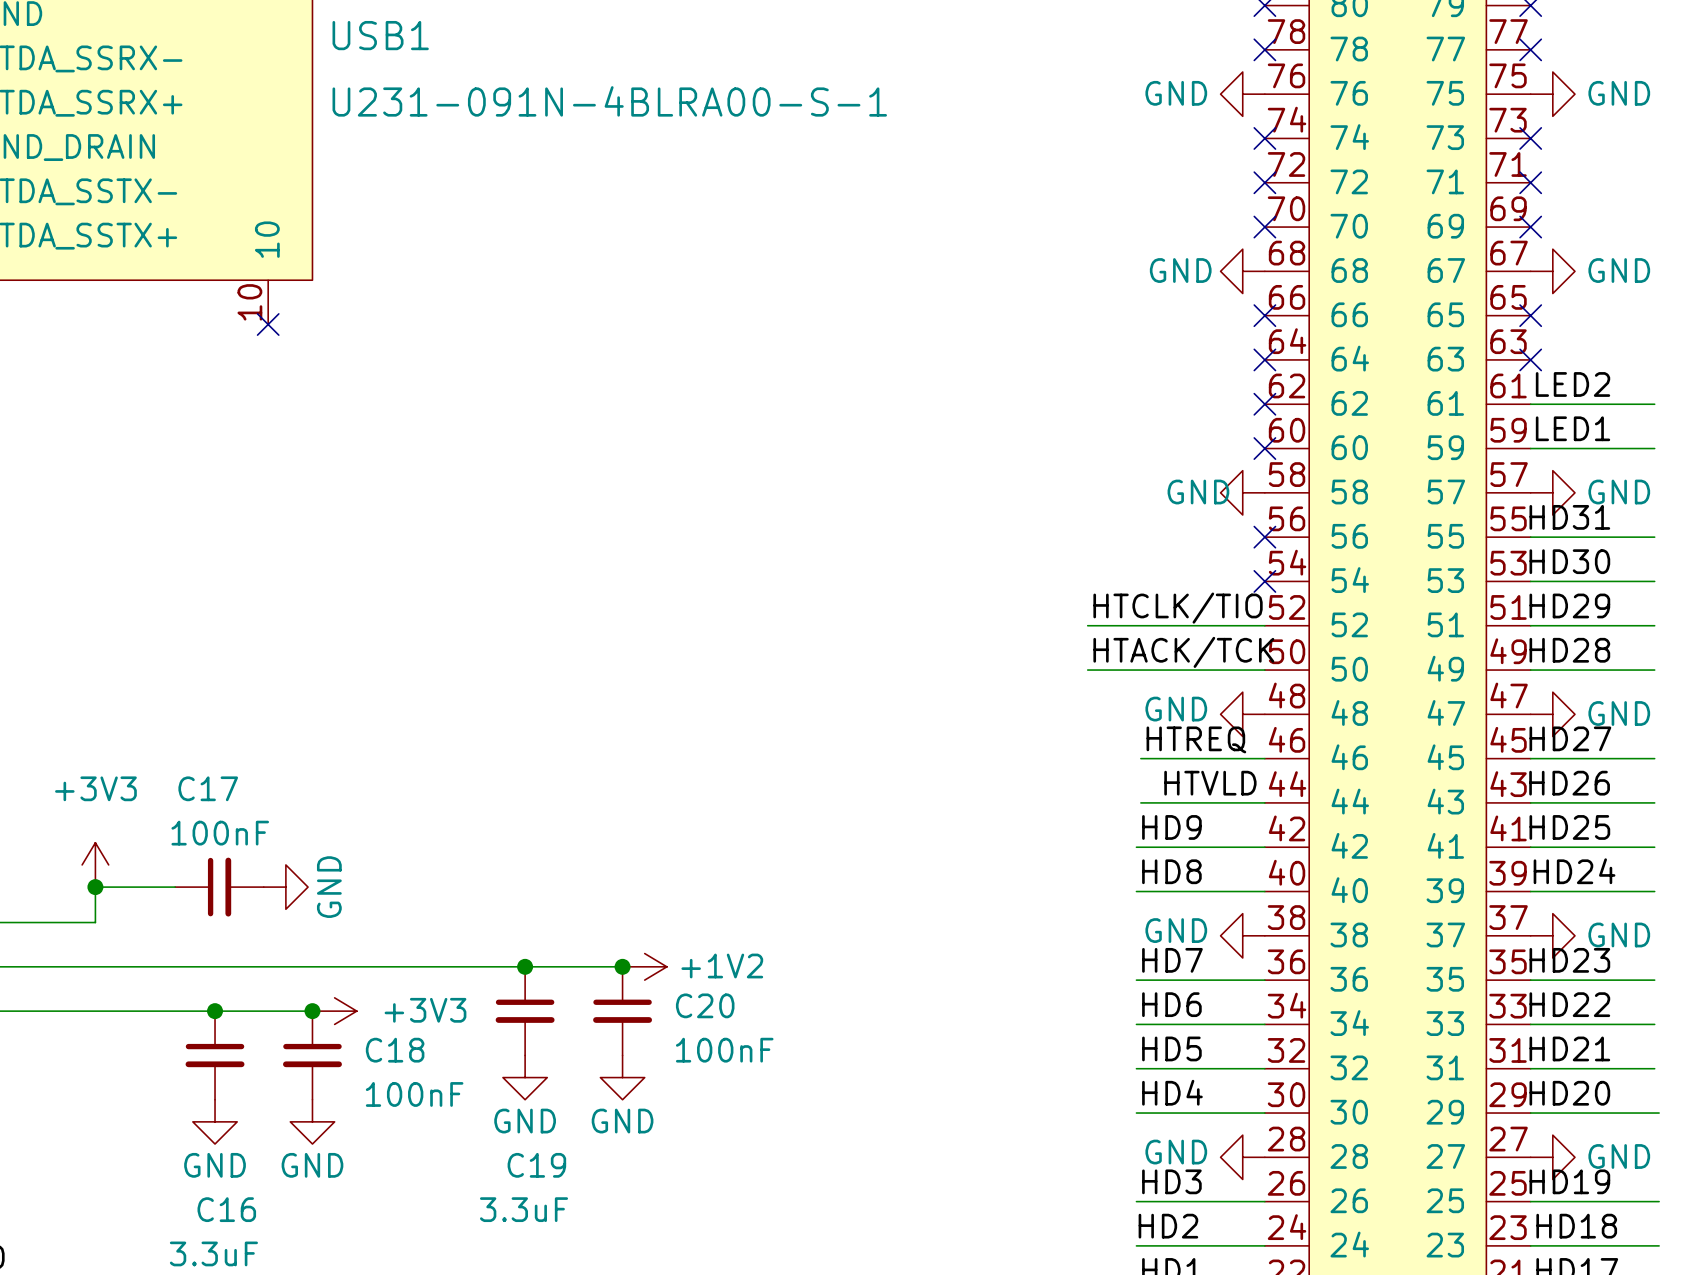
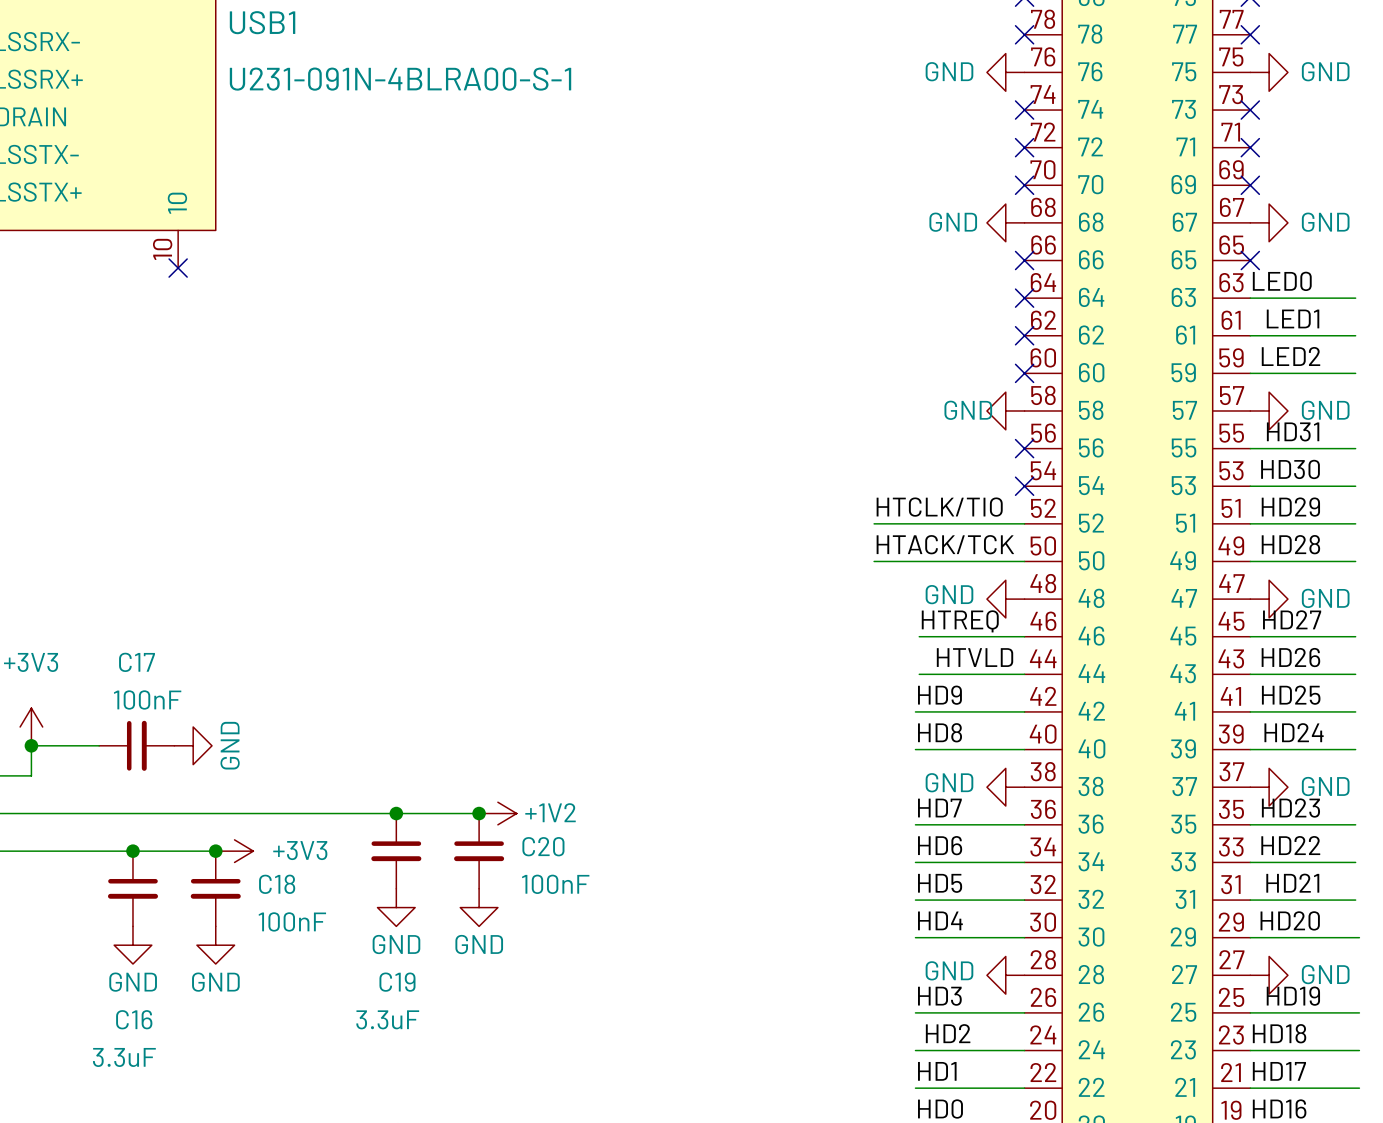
label: none -> LED0 (1282, 281)
wire: none -> (1250, 298) (1355, 298)
no-connect mark: (1530, 359) -> none
label: LED2 (1573, 384) -> LED1 (1293, 318)
label: LED1 (1573, 428) -> LED2 (1291, 356)

